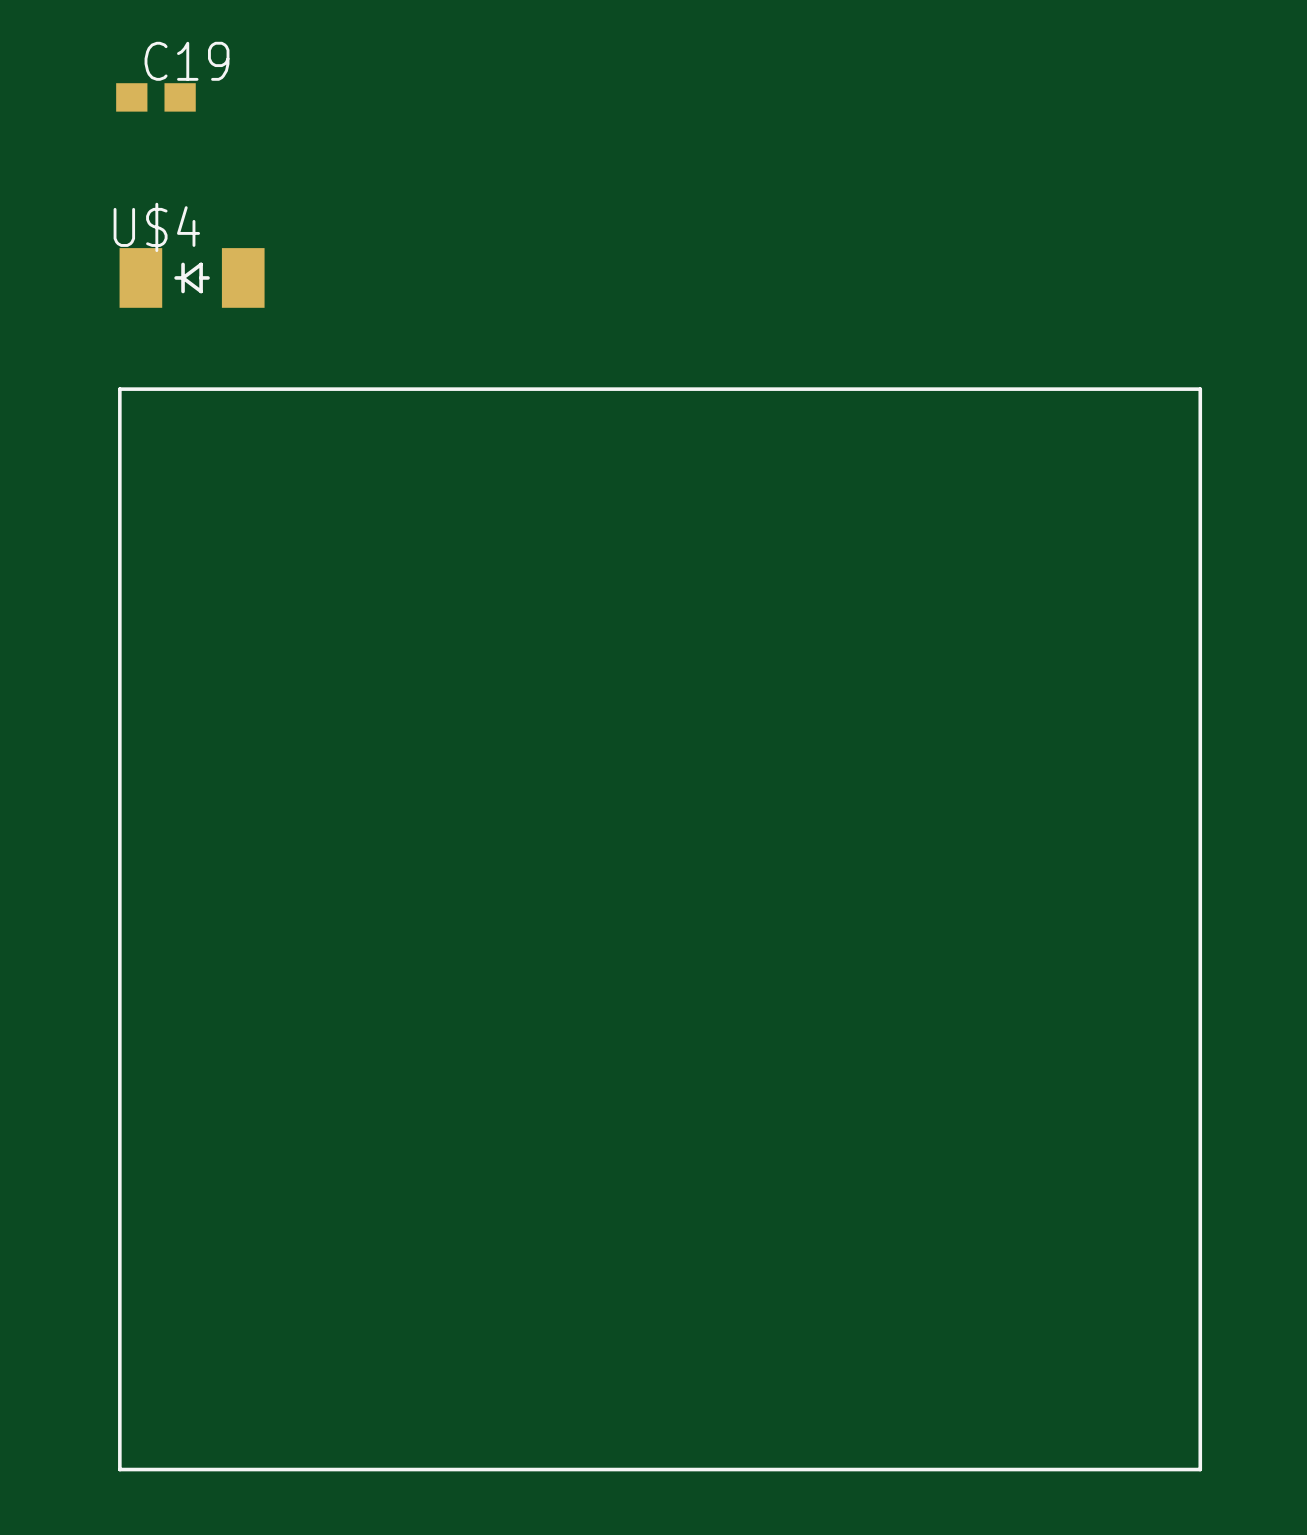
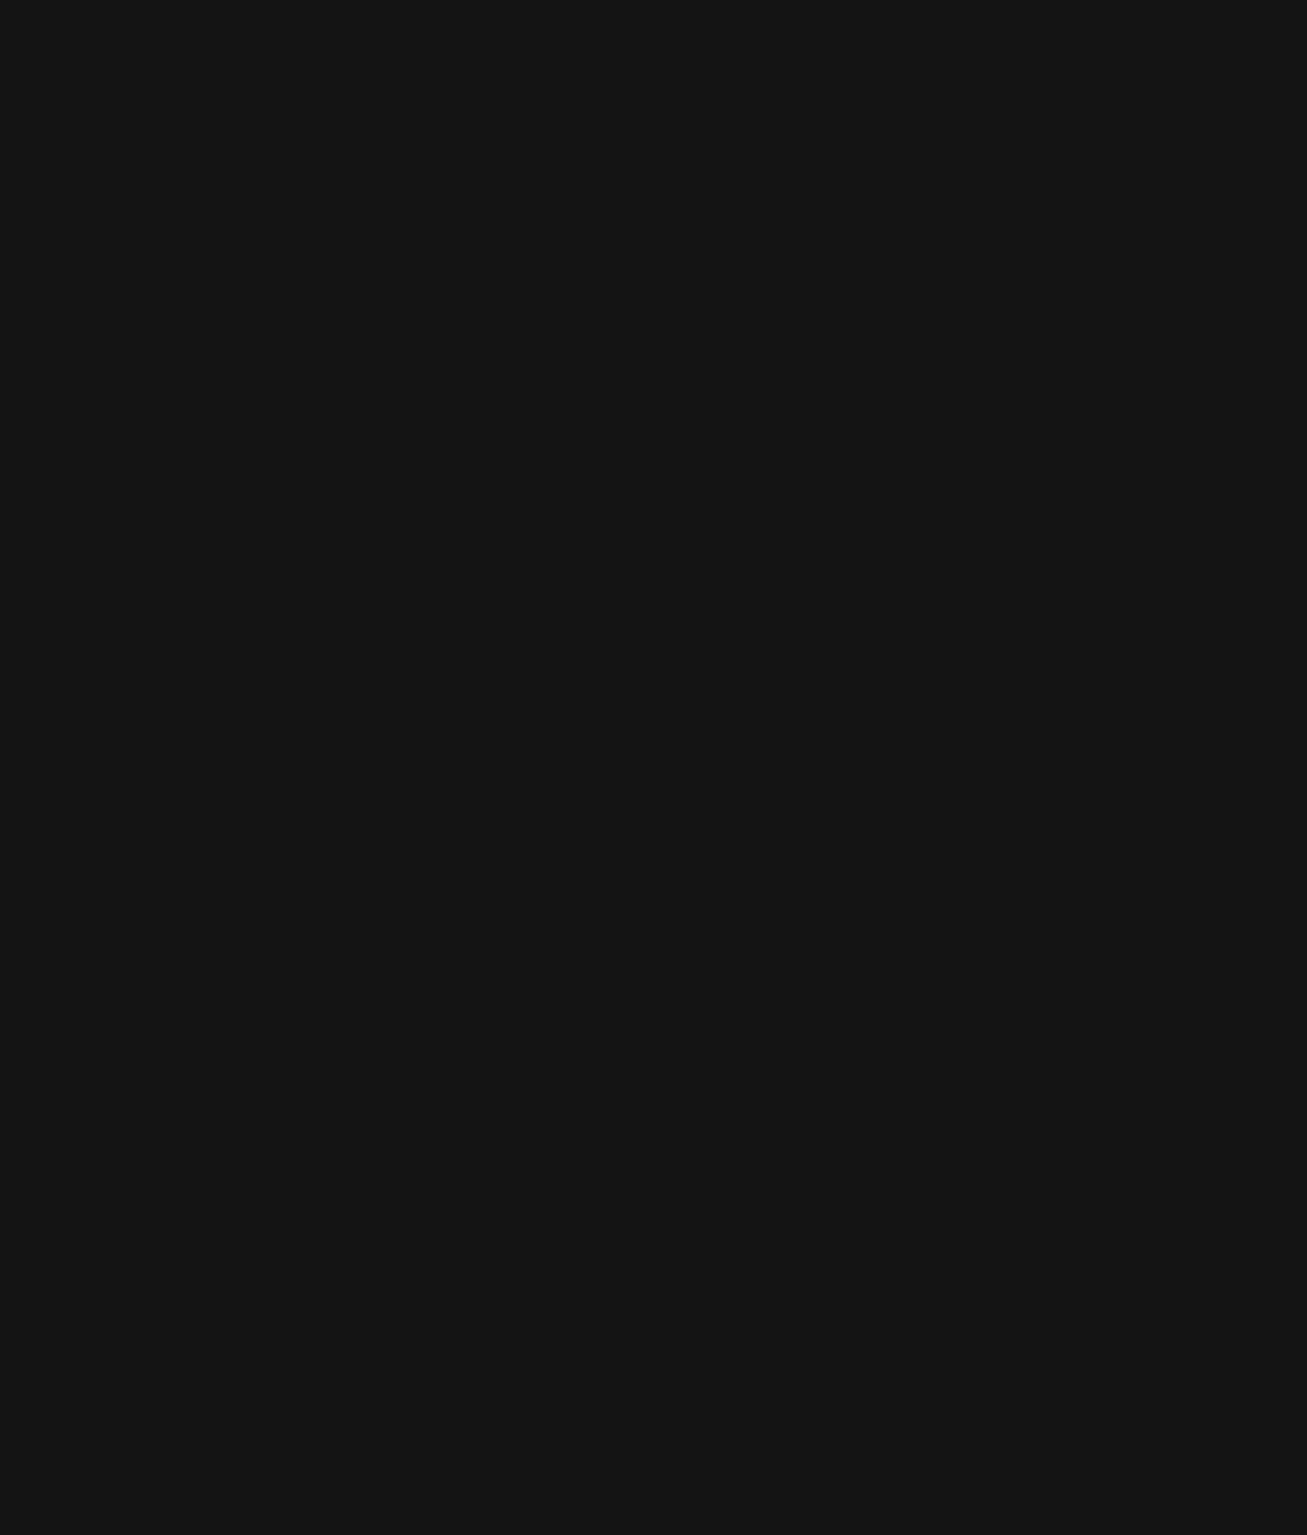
C19: (155, 97) -> none
U$4: (192, 277) -> none
drawing: [118, 387, 1203, 1472] -> none

